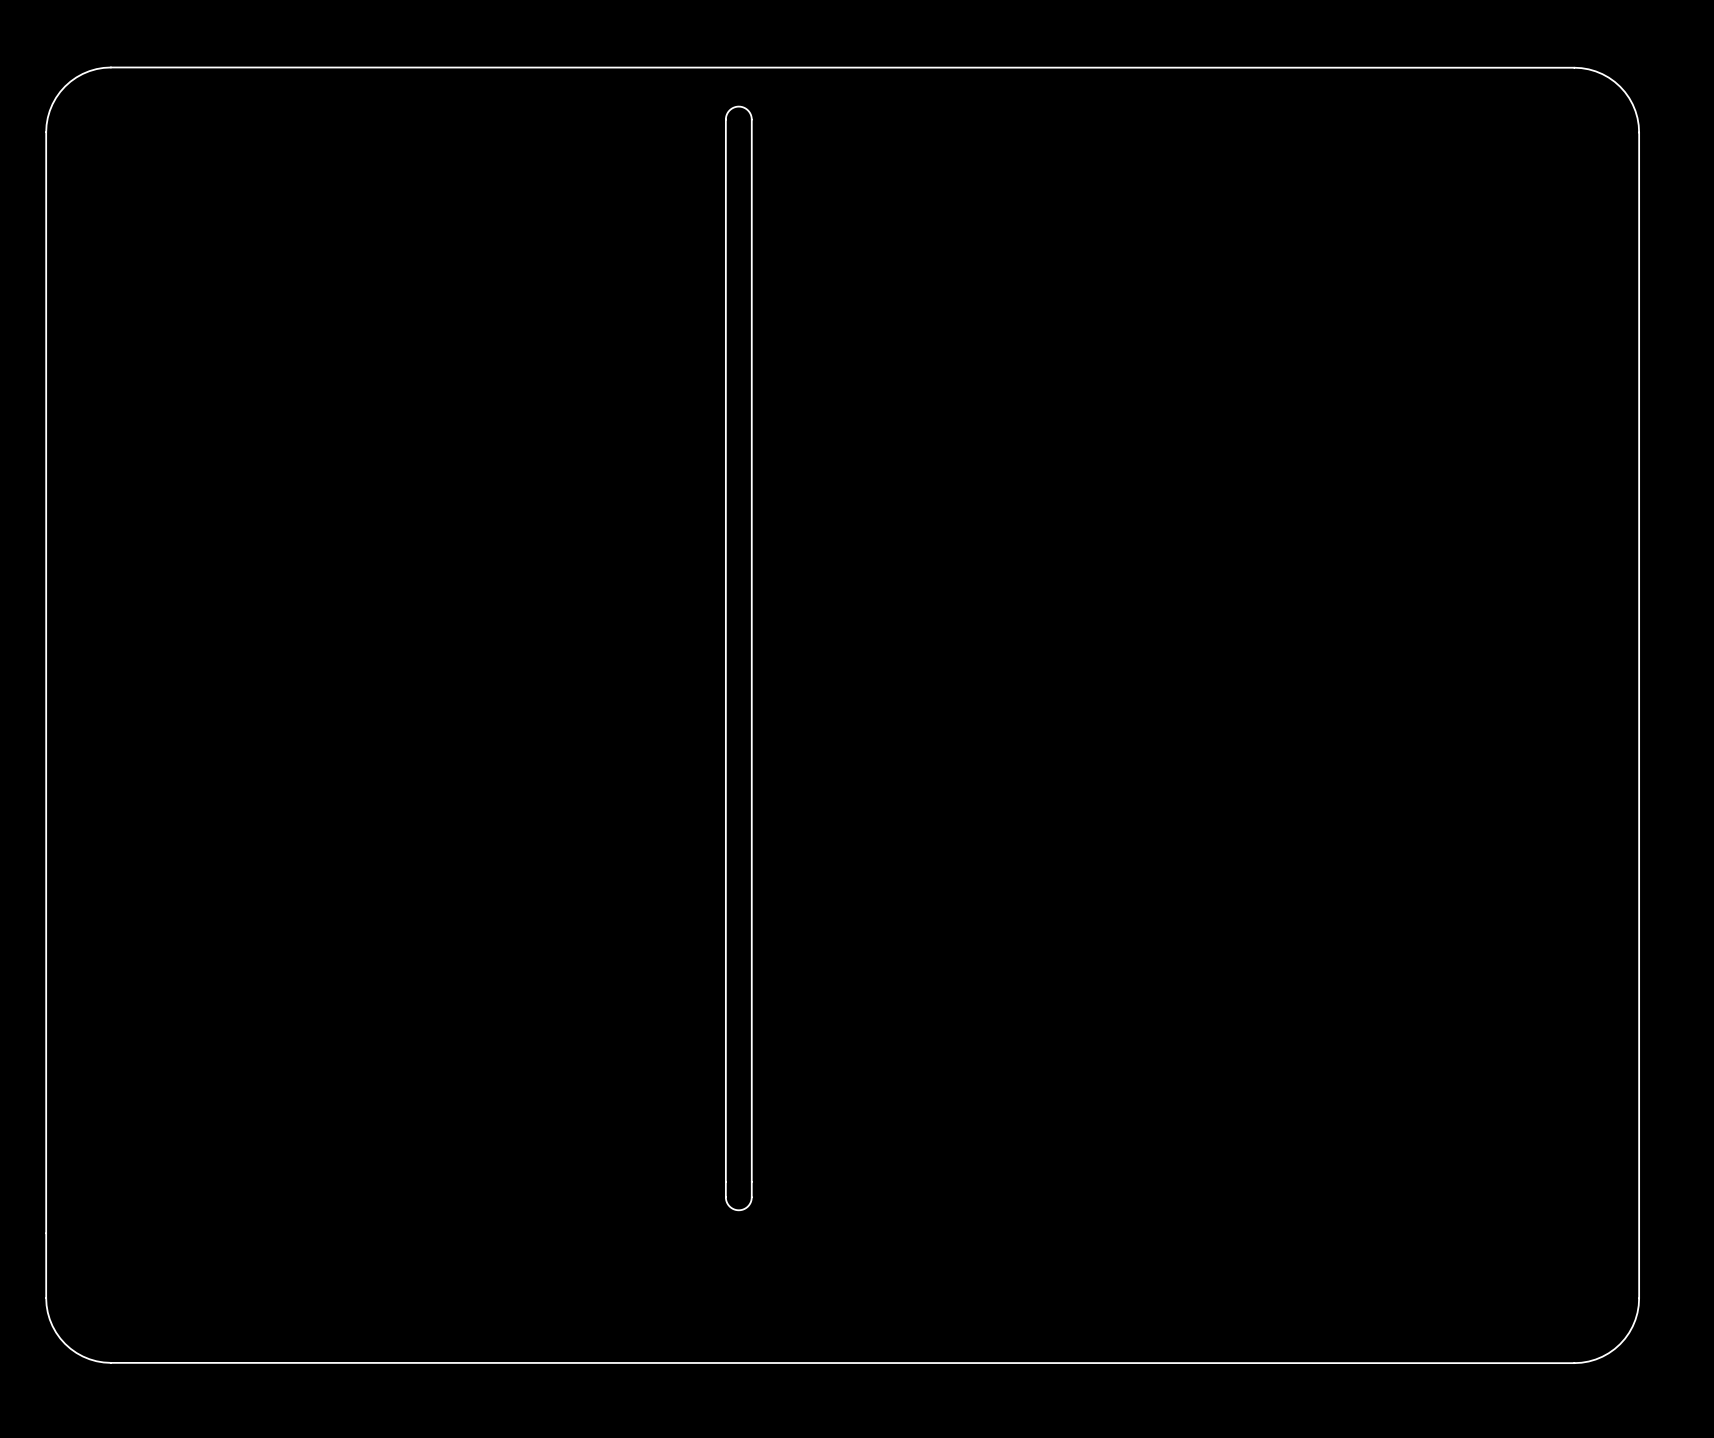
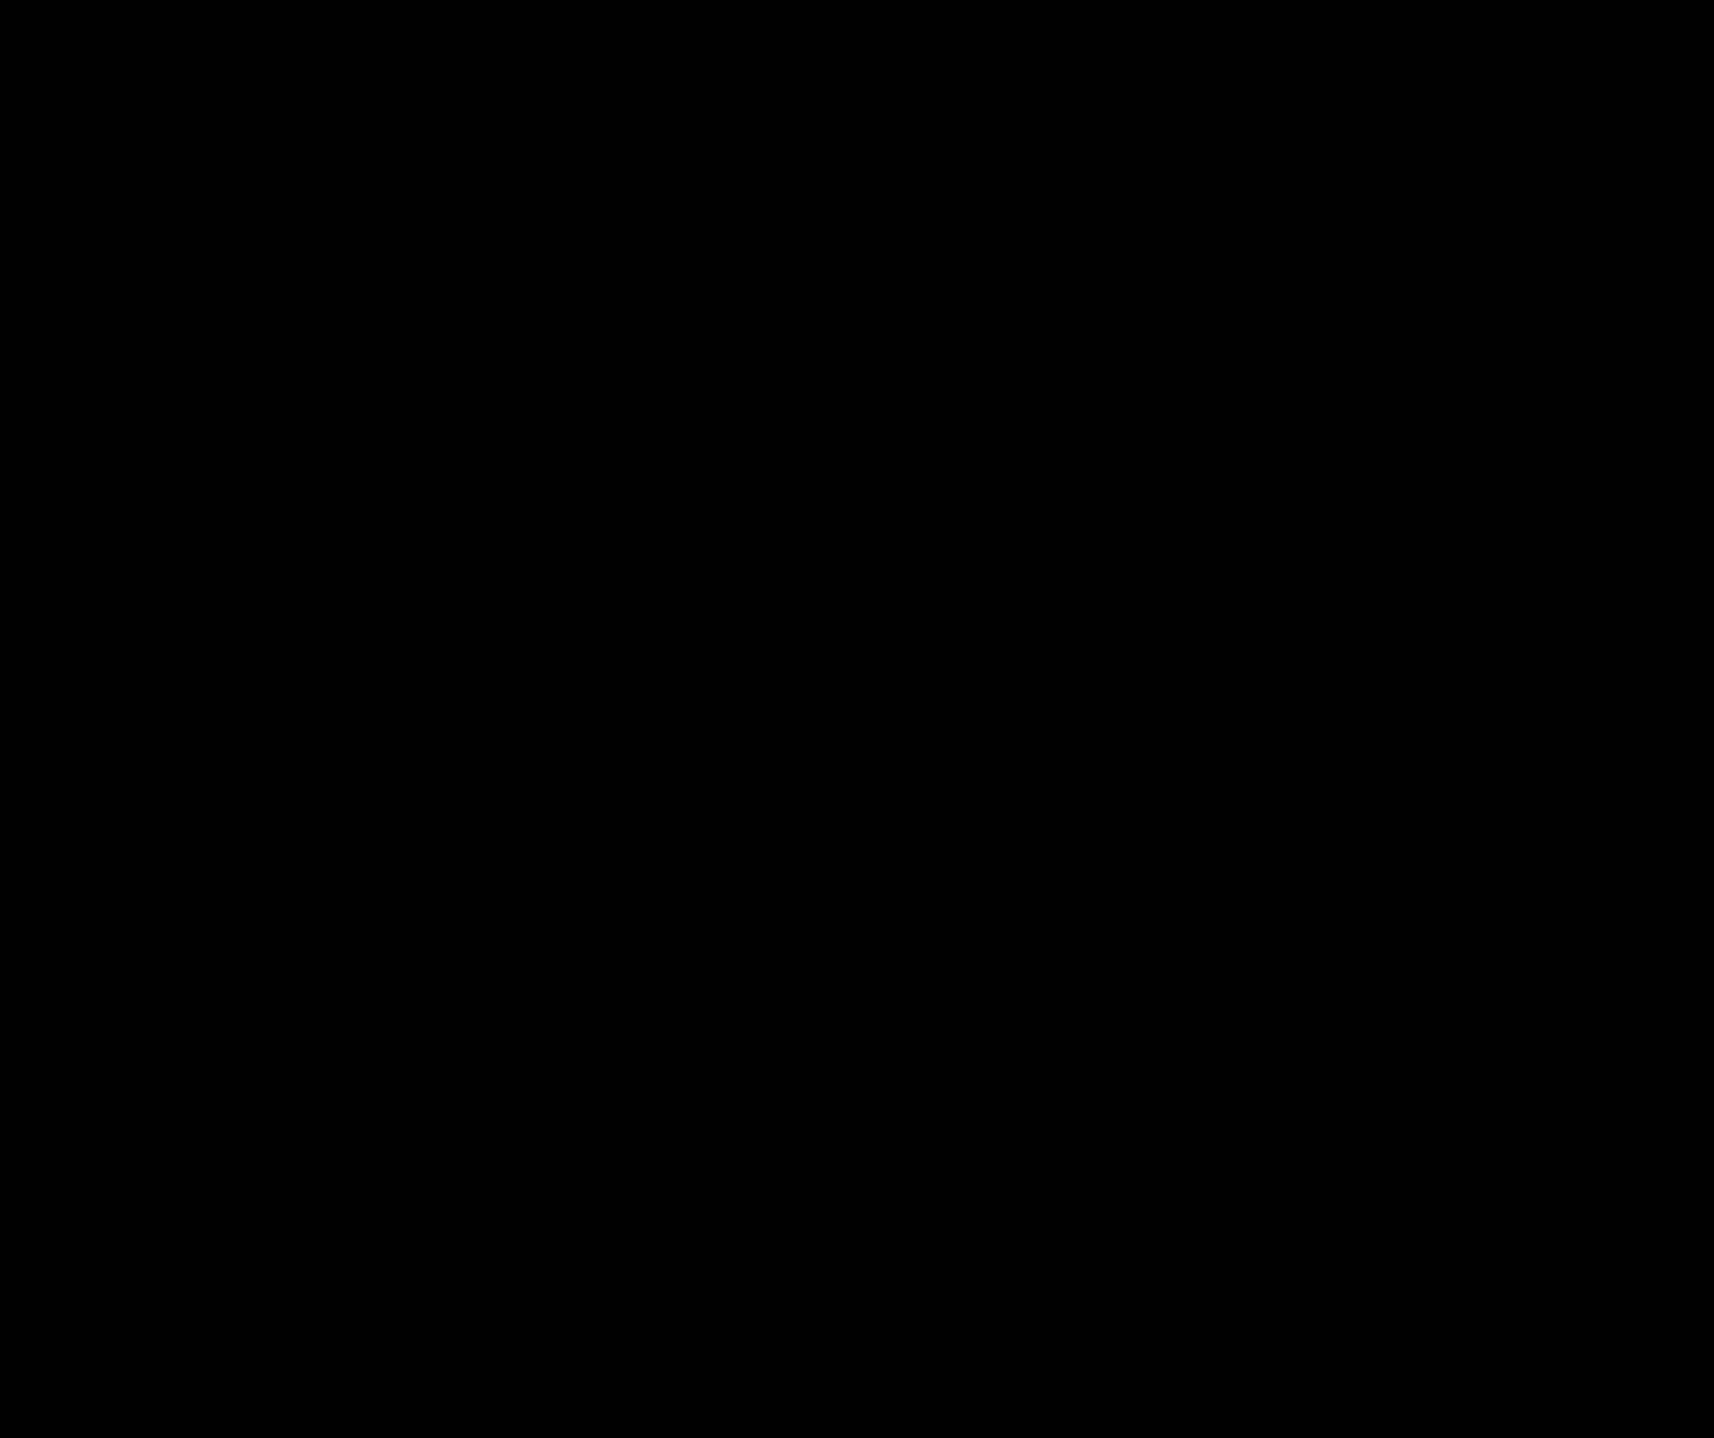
board edge: (110, 67) (1574, 67) (1595, 71) (1614, 81) (1625, 92) (1632, 104) (1637, 118) (1639, 132) (1639, 1298) (1635, 1319) (1625, 1338) (1614, 1349) (1602, 1356) (1588, 1361) (1574, 1363) (110, 1362) (89, 1359) (70, 1348) (60, 1338) (52, 1326) (47, 1312) (46, 1298) (46, 132) (49, 110) (56, 97) (65, 86) (76, 77) (89, 71) (110, 67) -> none
board edge: (725, 119) (725, 1197) (729, 1205) (738, 1210) (748, 1205) (751, 1197) (751, 119) (747, 110) (738, 106) (729, 110) (725, 119) -> none

